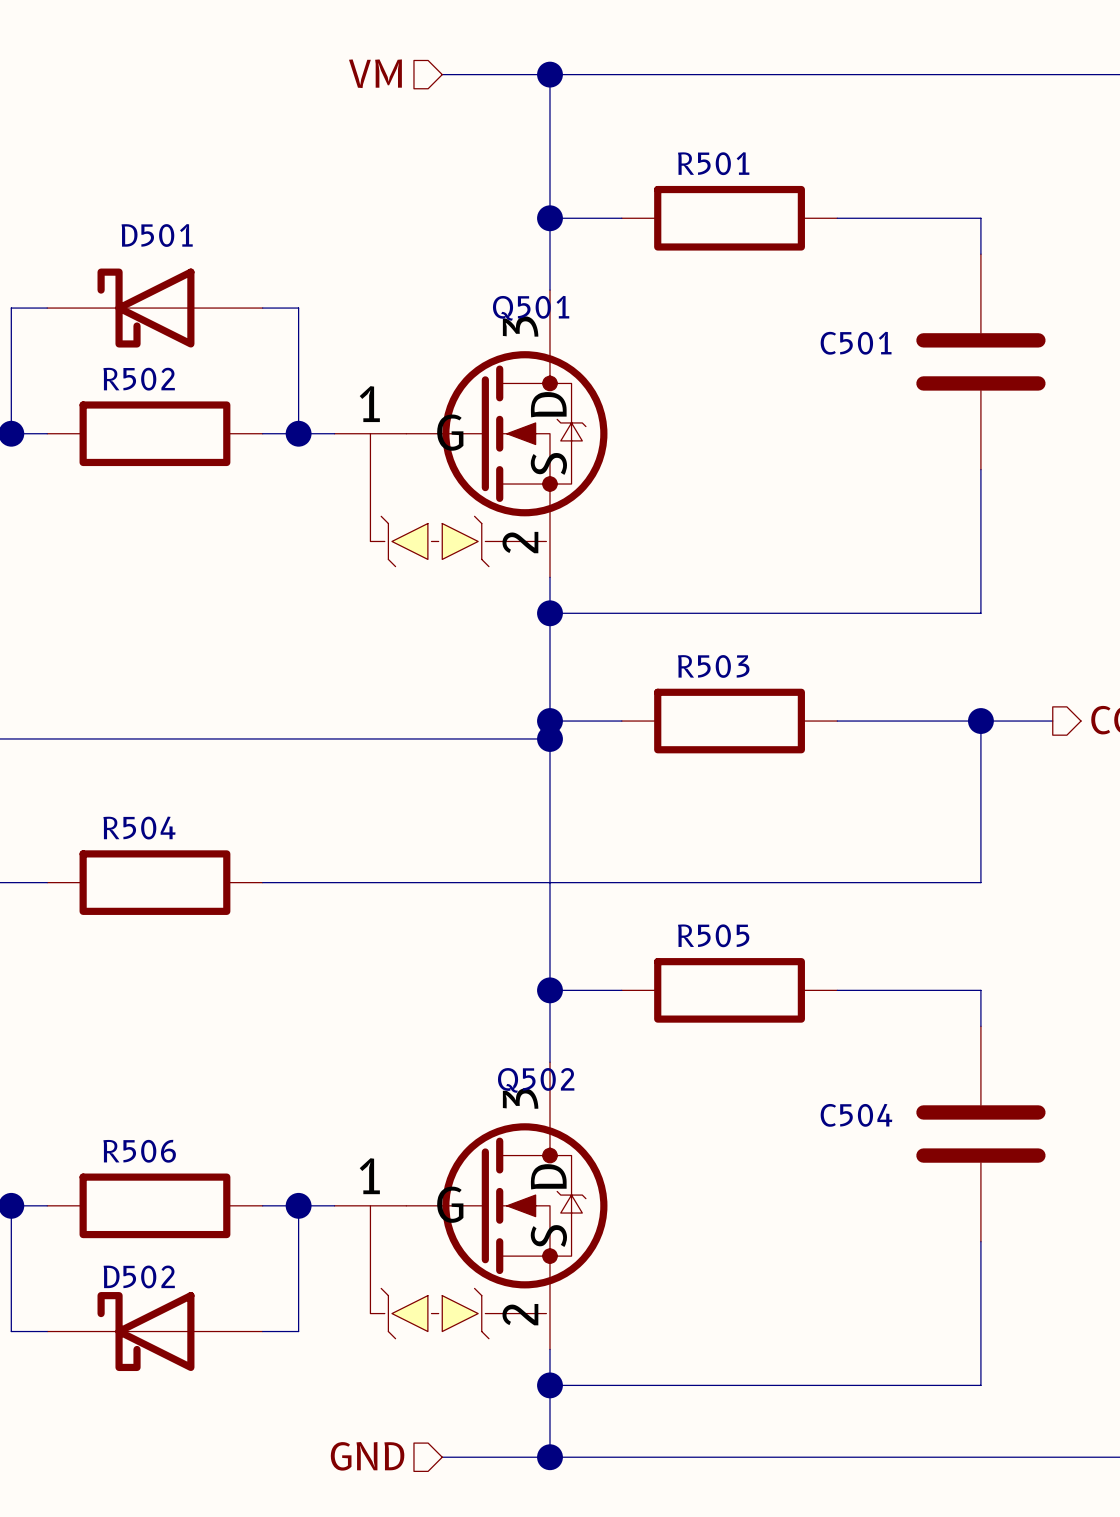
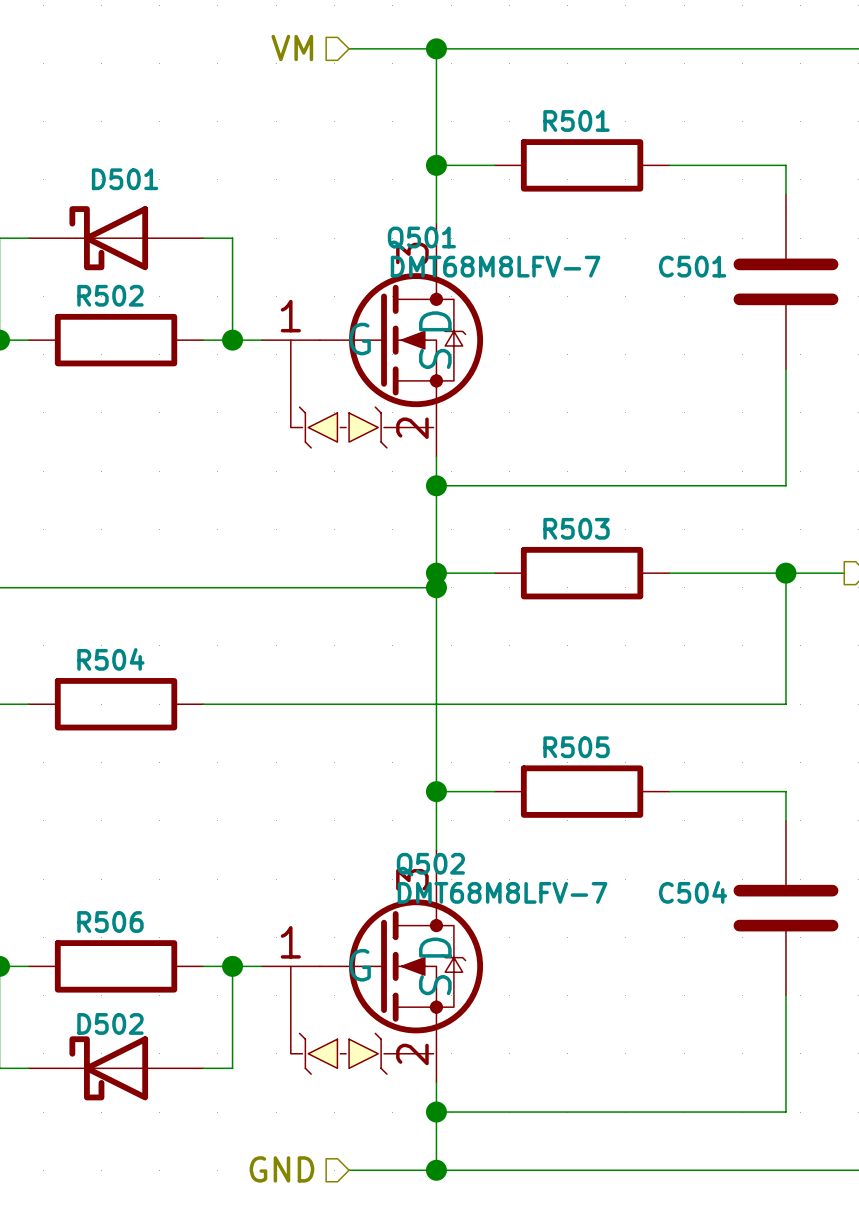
Q501 value: none -> DMT68M8LFV-7 (495, 266)
Q502 value: none -> DMT68M8LFV-7 (502, 892)

